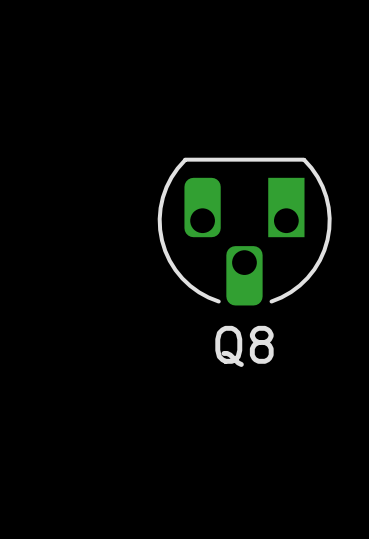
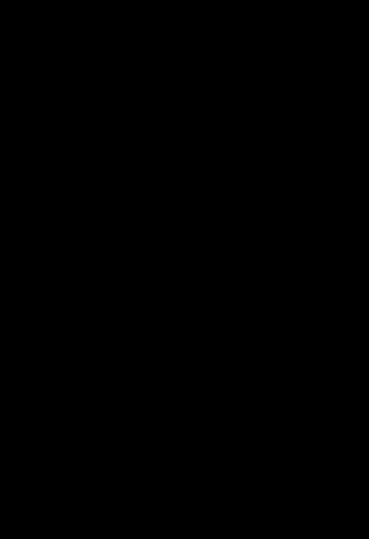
Q8: (244, 231) -> none

